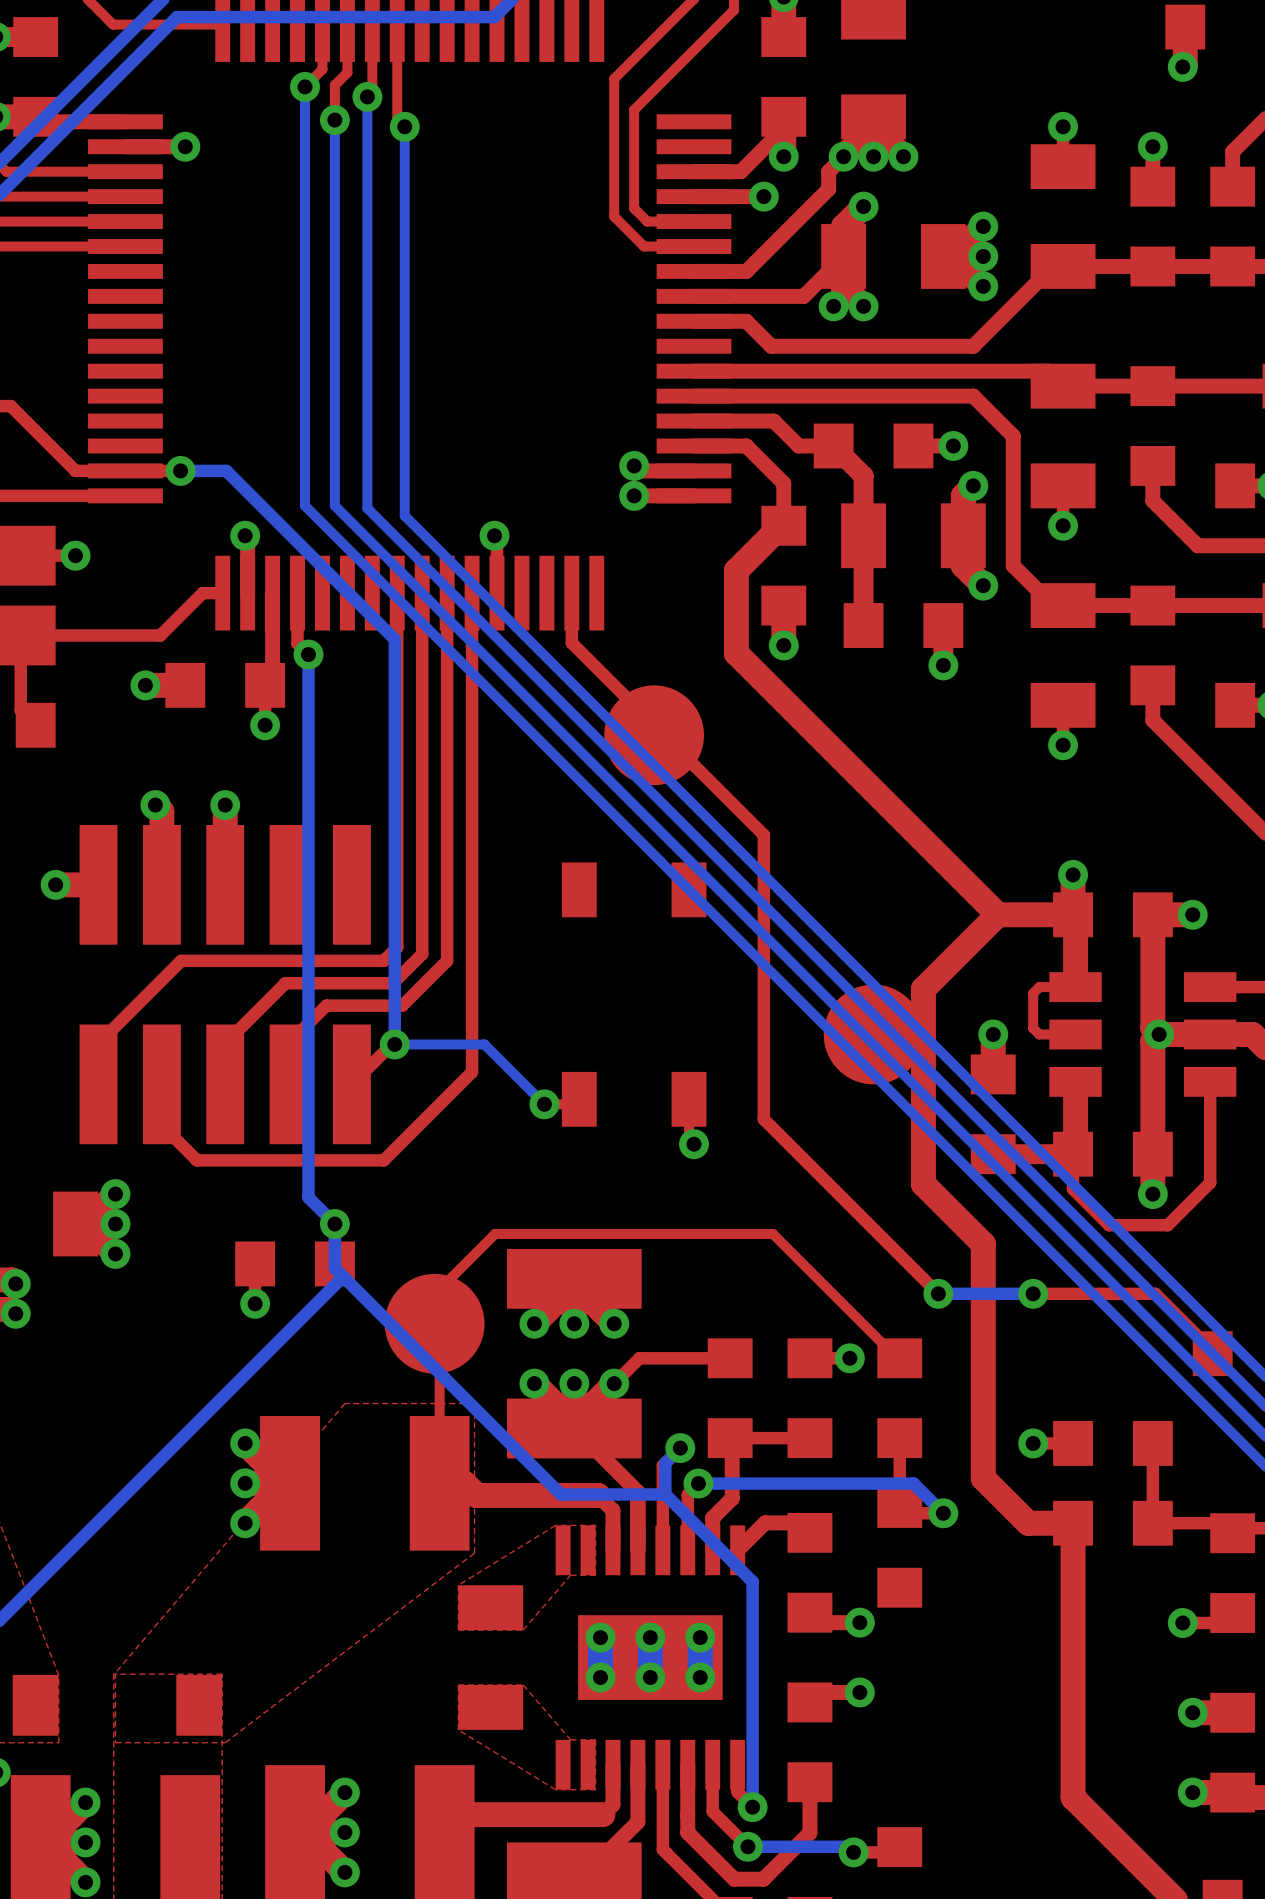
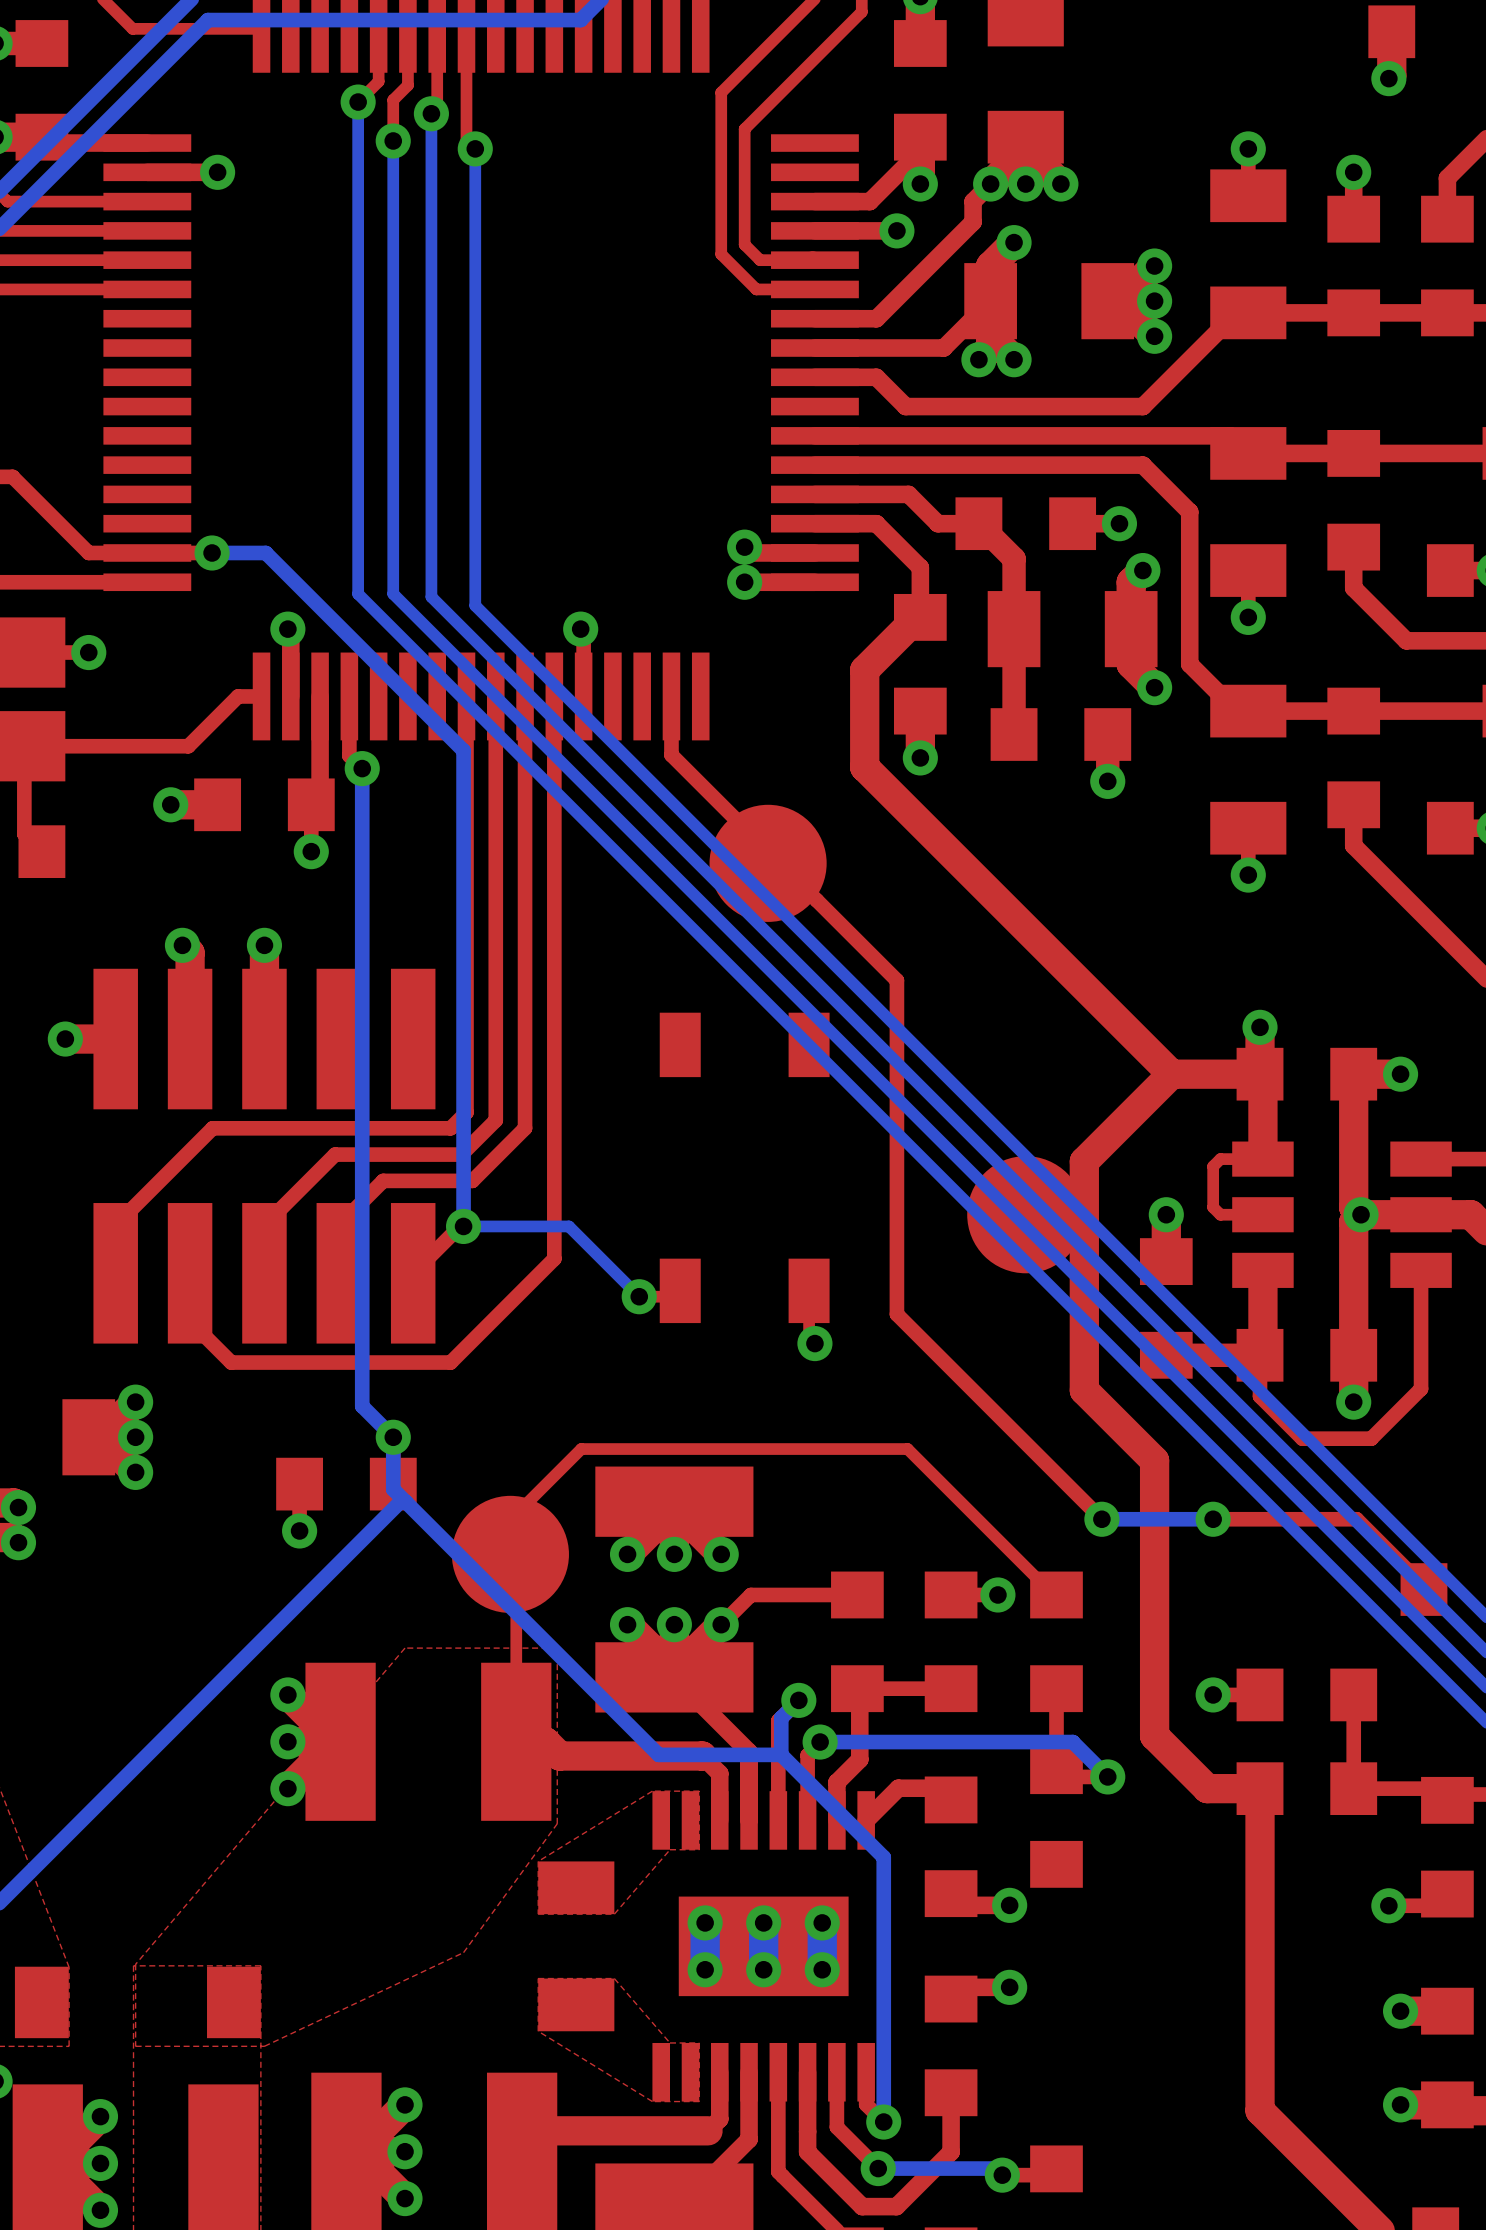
top zone outline: (474, 1553) (225, 1742) -> (557, 1823) (463, 1952) (264, 2046)

